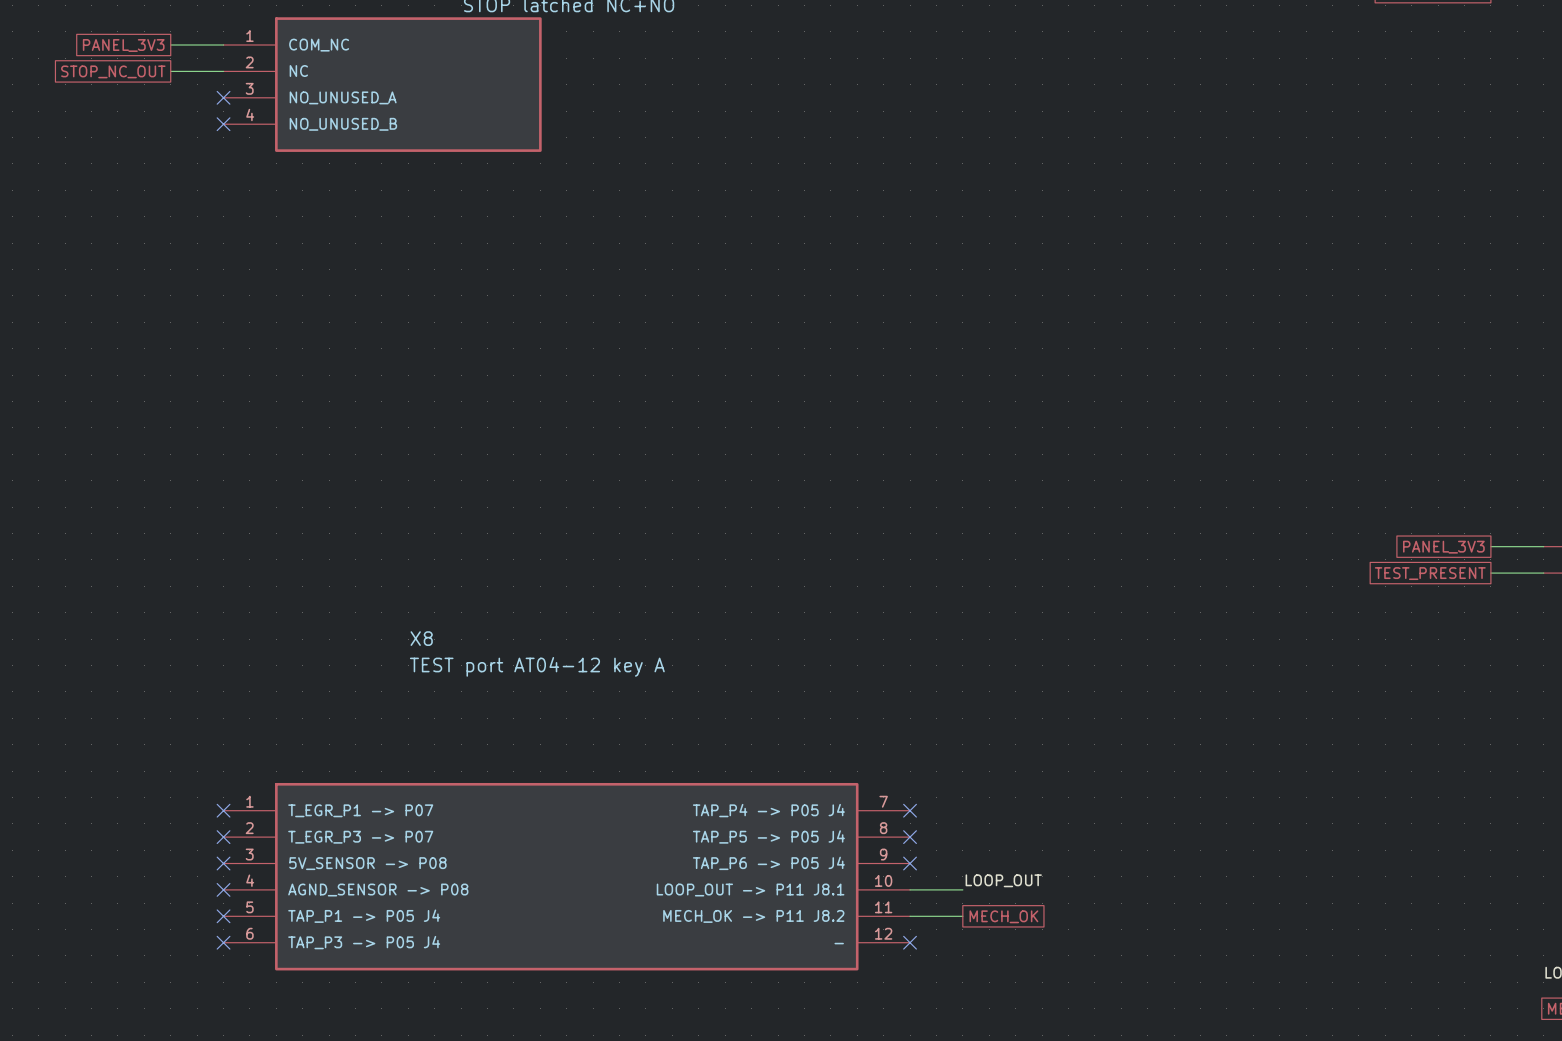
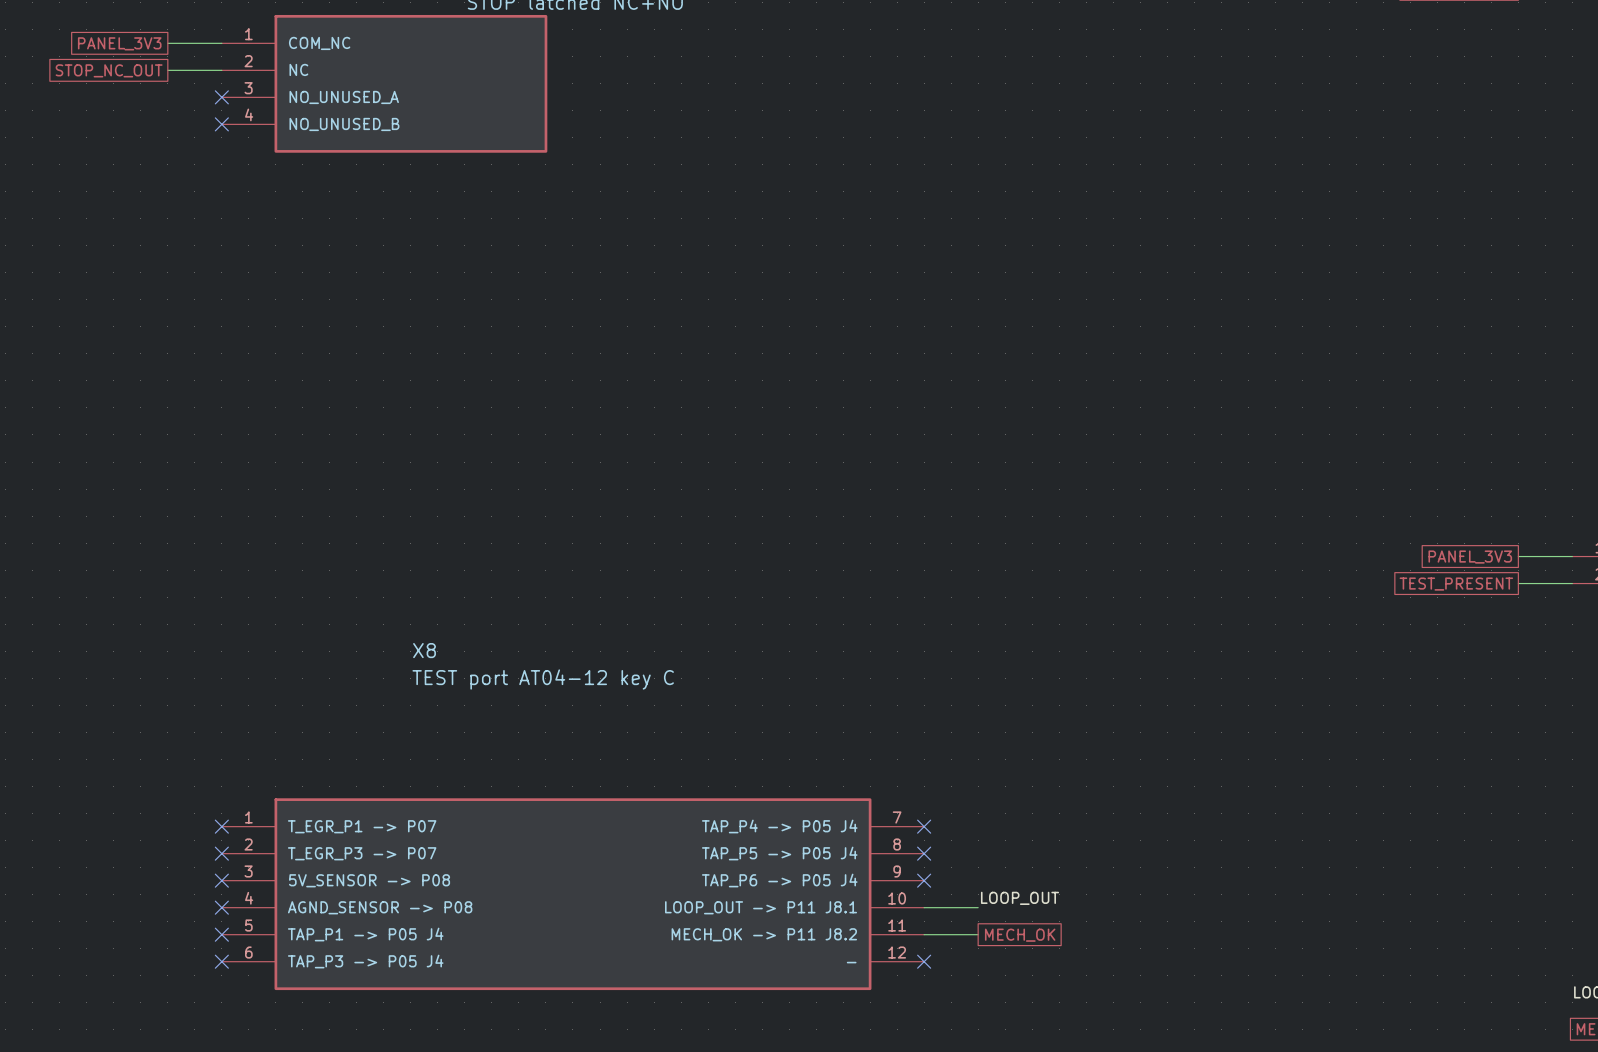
X8 value: TEST port AT04-12 key A (537, 666) -> TEST port AT04-12 key C (543, 679)

